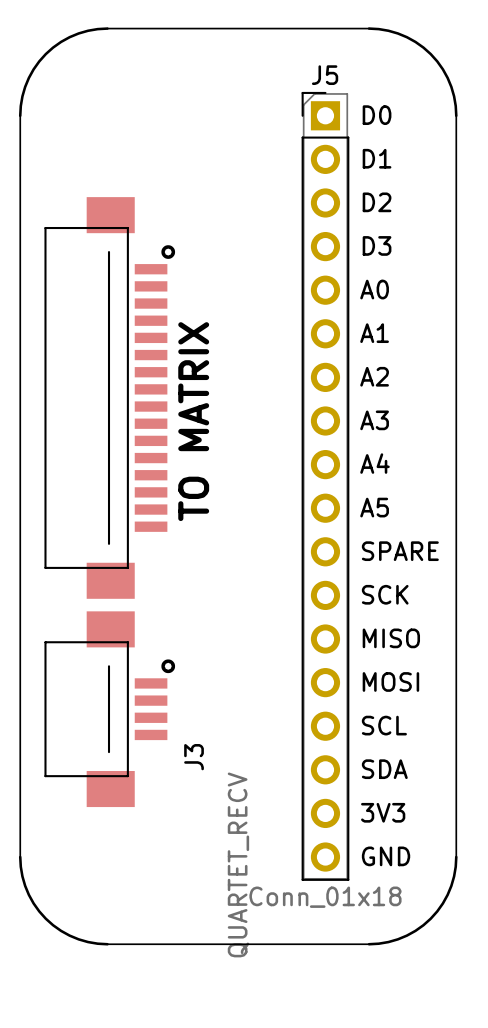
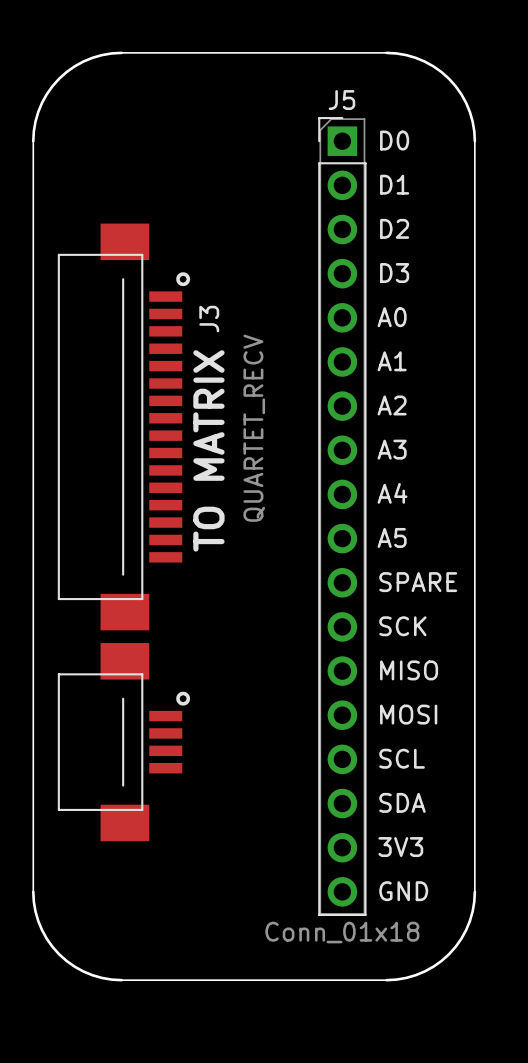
J3 name position: J3 (194, 757) -> J3 (209, 319)
J3 value position: QUARTET_RECV (238, 864) -> QUARTET_RECV (254, 428)

